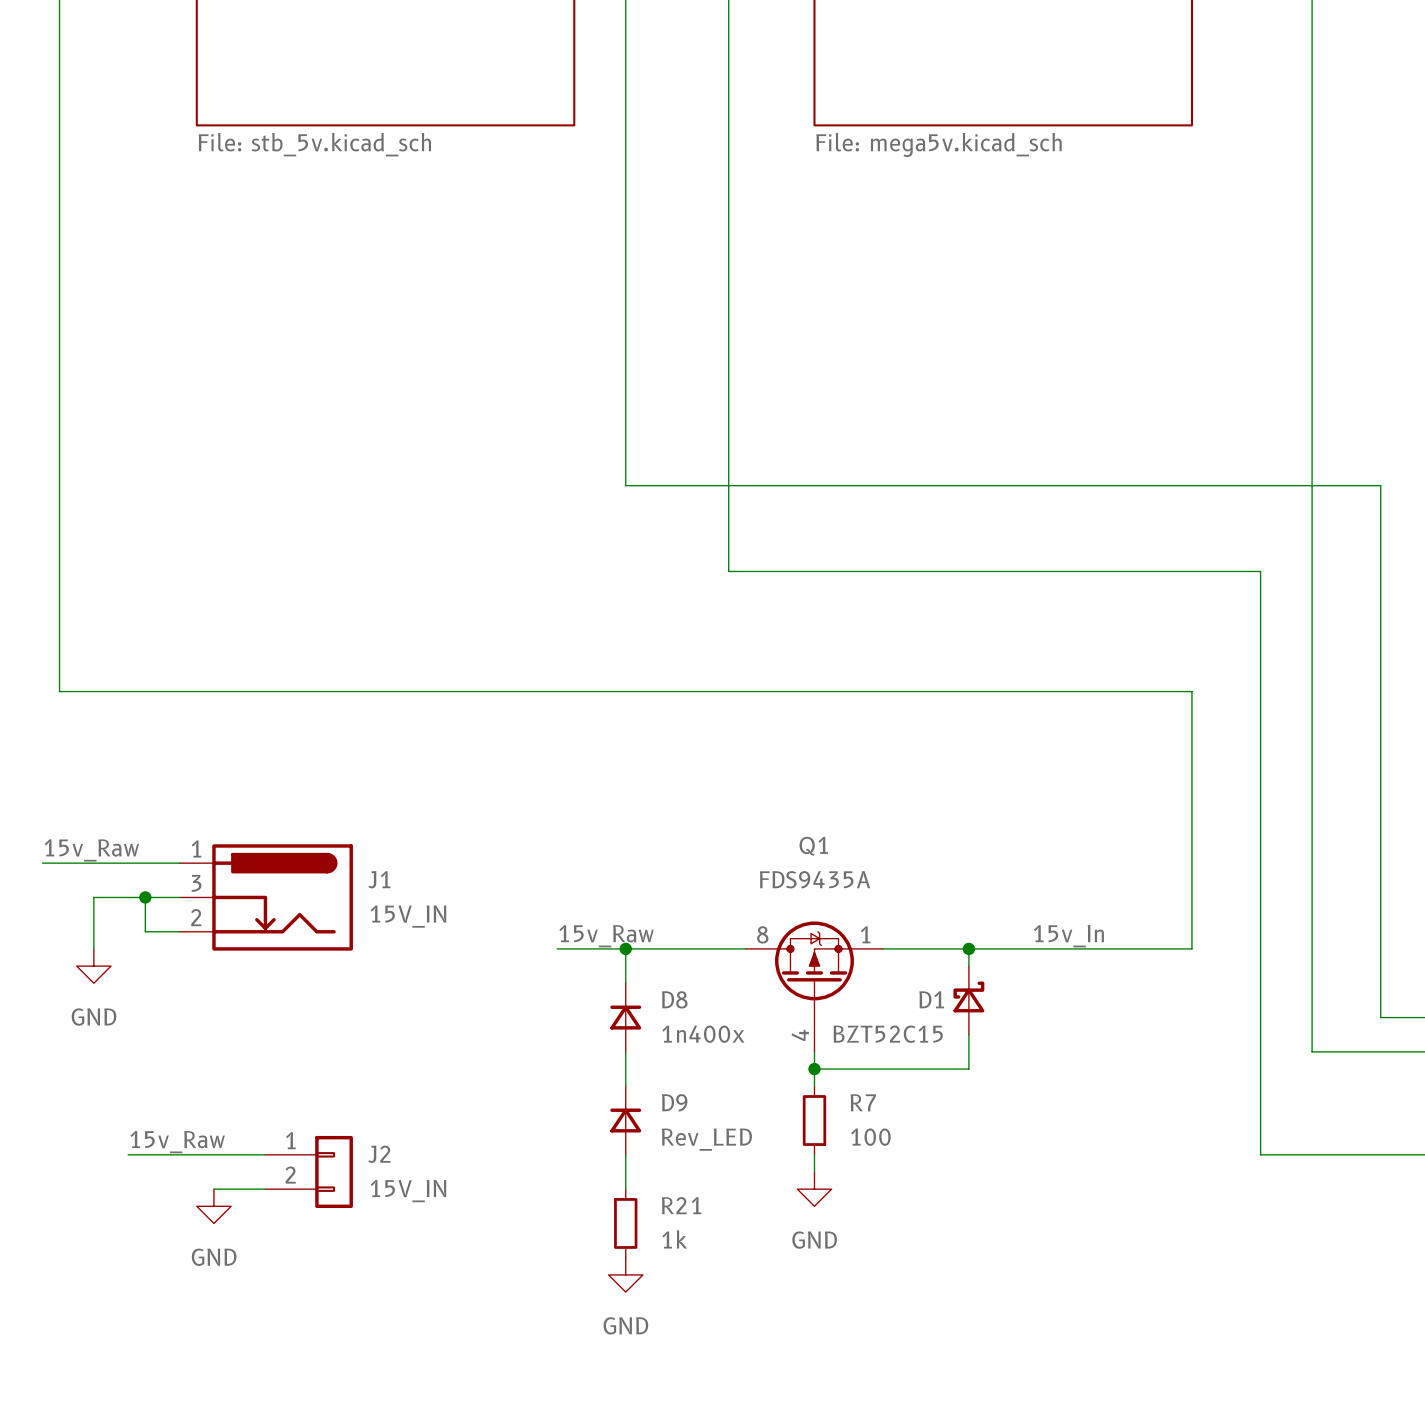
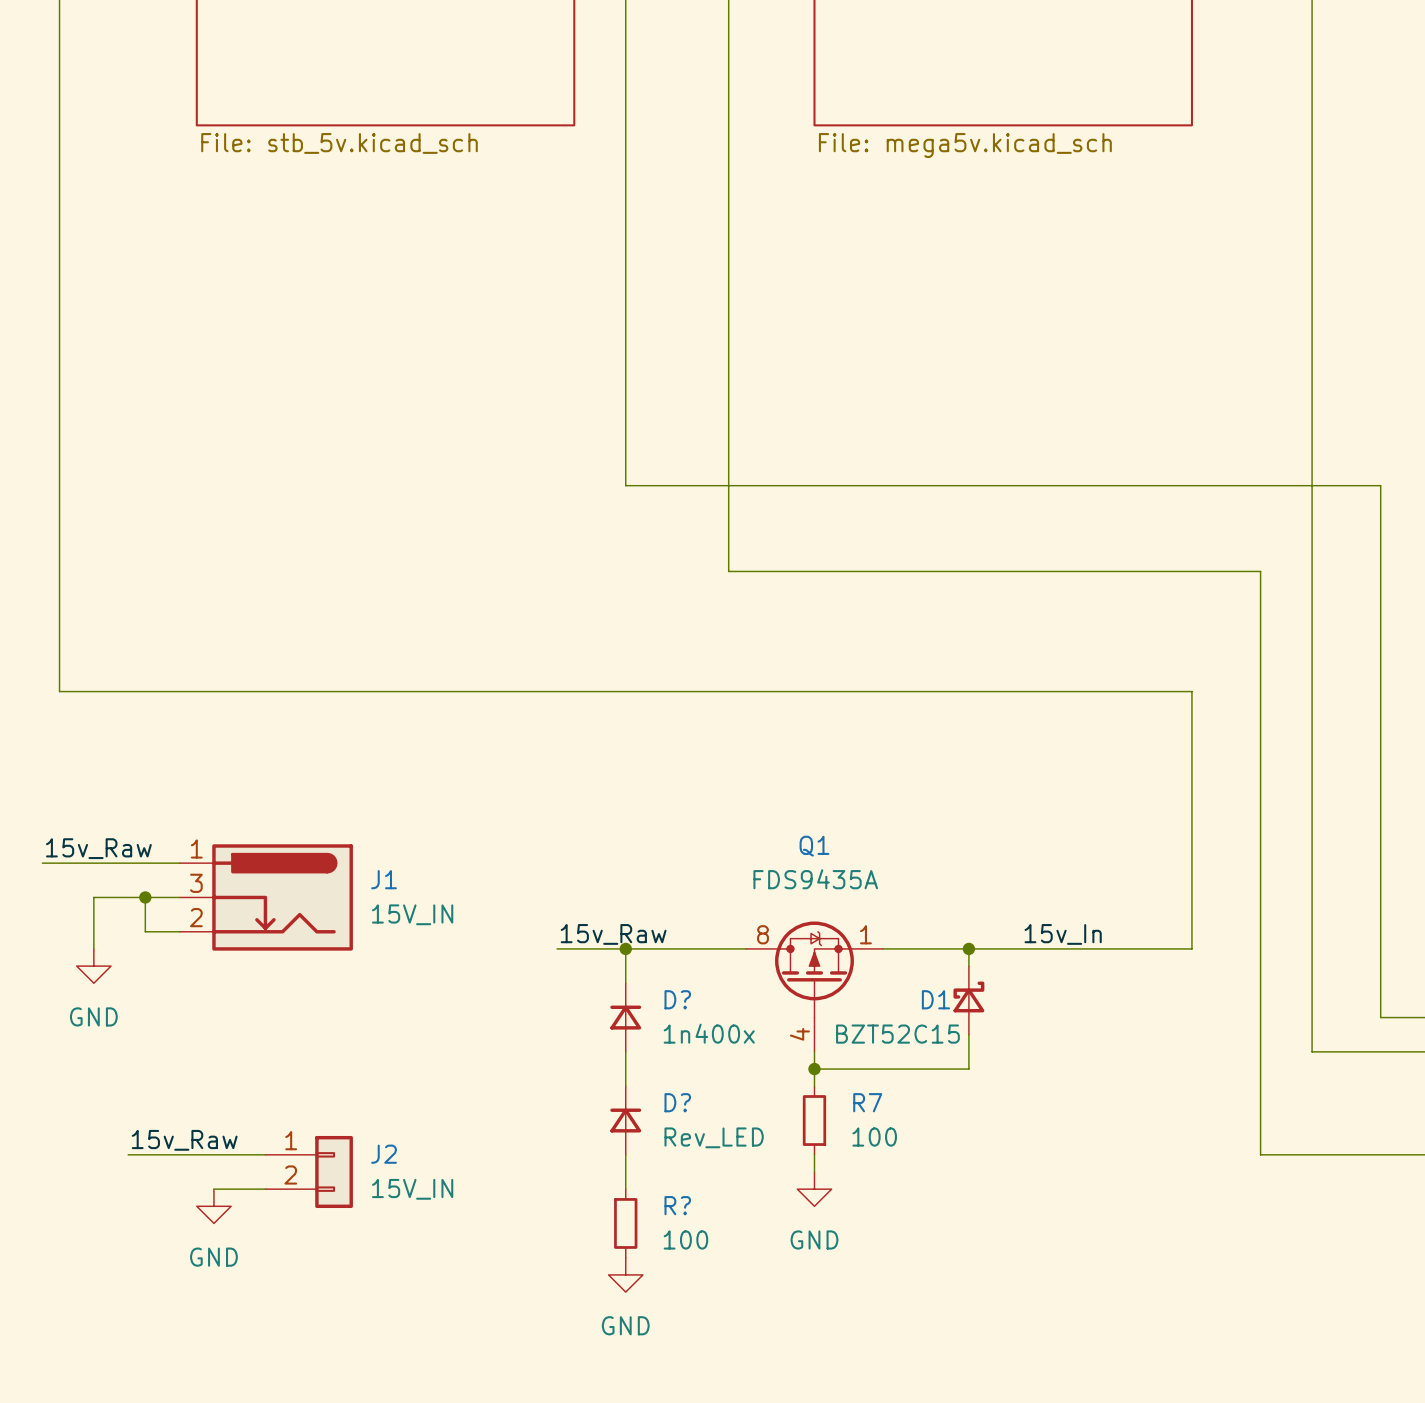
D8 name: D8 (674, 999) -> D? (677, 999)
D9 name: D9 (674, 1102) -> D? (677, 1102)
R21 name: R21 (681, 1205) -> R? (677, 1205)
R21 value: 1k (674, 1239) -> 100 (685, 1239)

